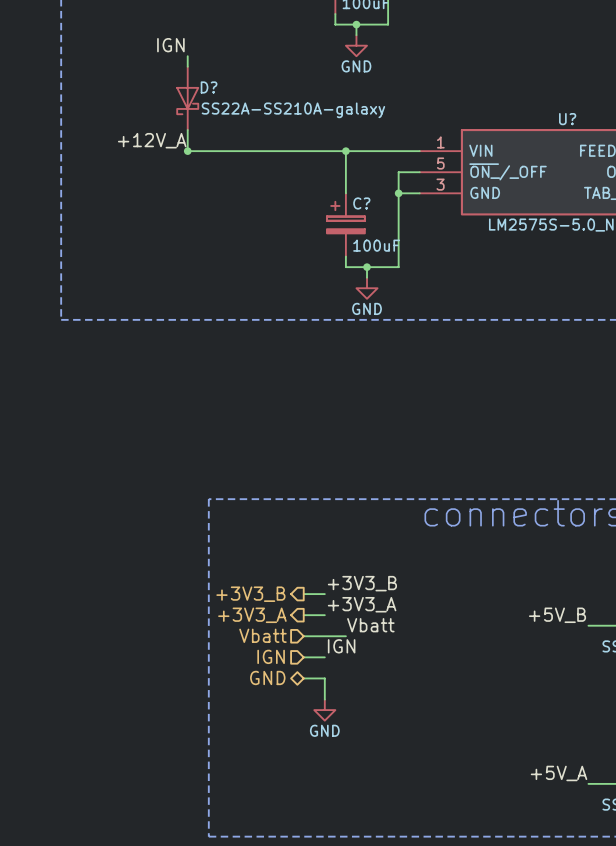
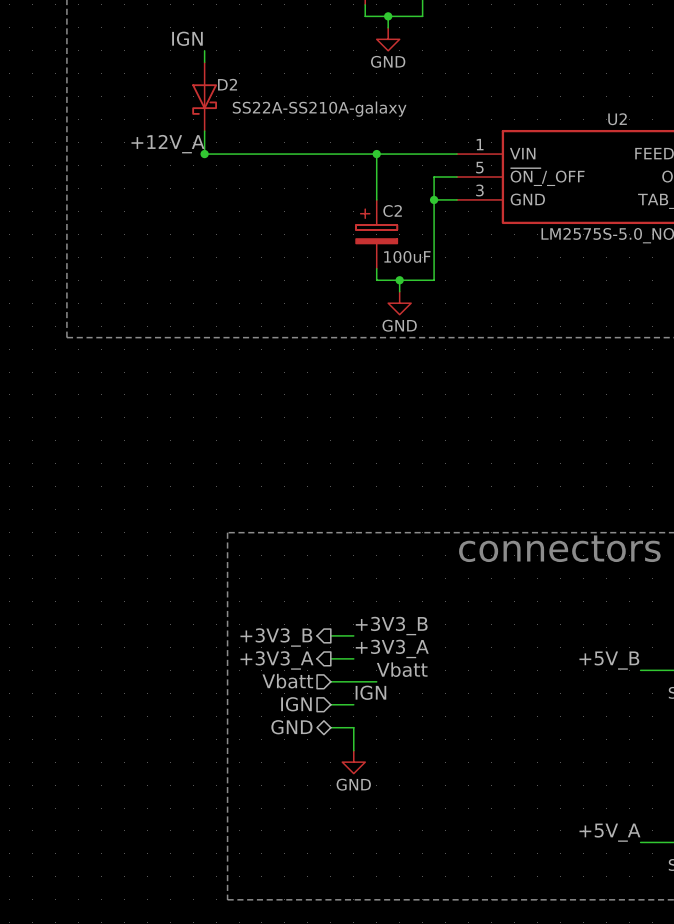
D? name: D? (209, 87) -> D2 (227, 84)
U? name: U? (567, 119) -> U2 (617, 119)
C? name: C? (361, 203) -> C2 (392, 211)

